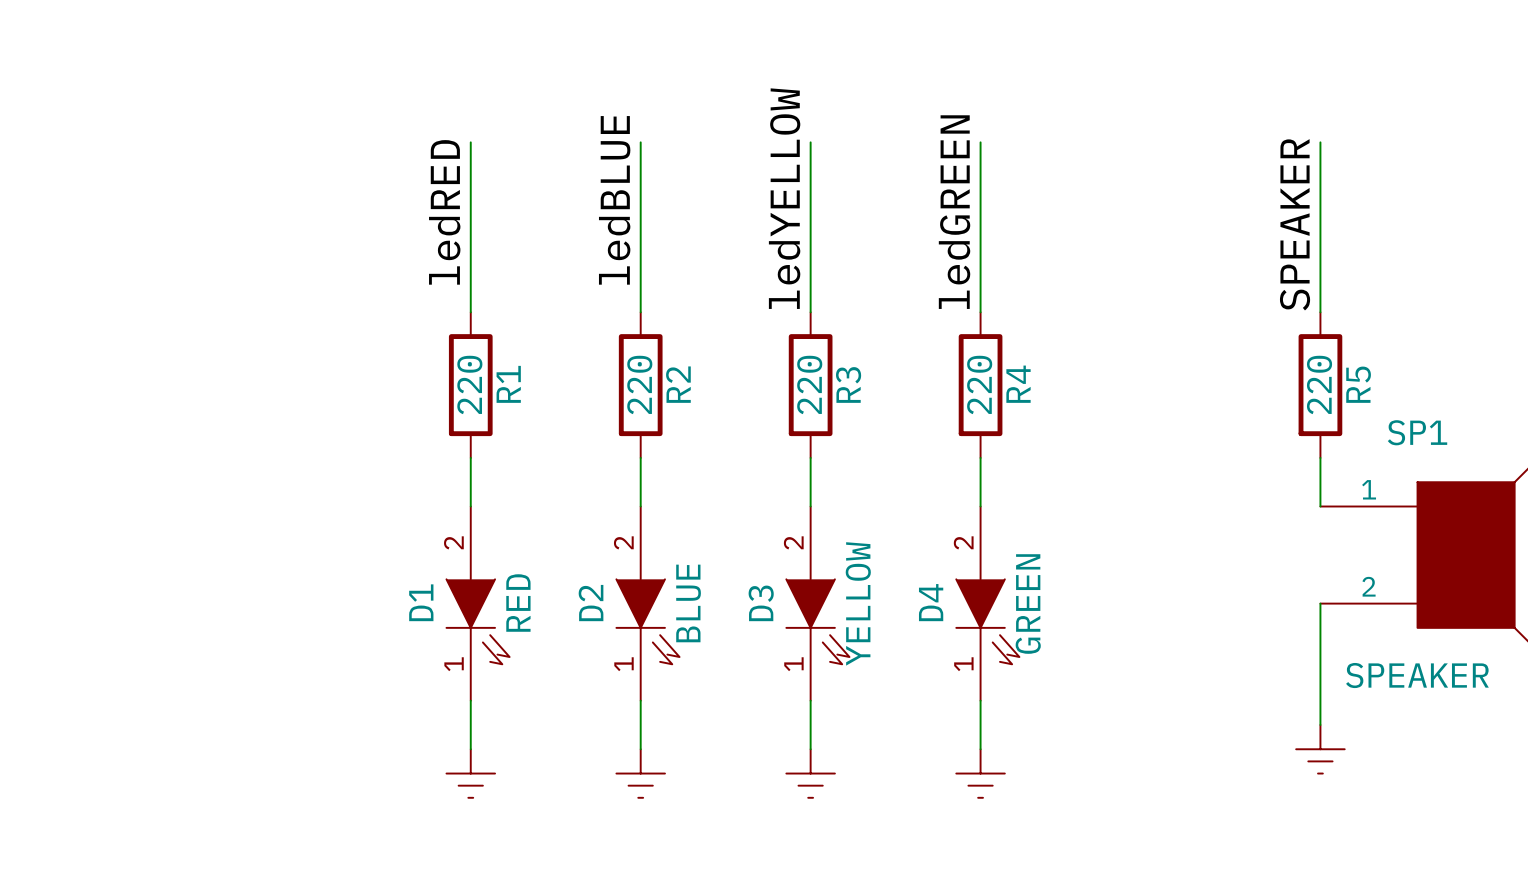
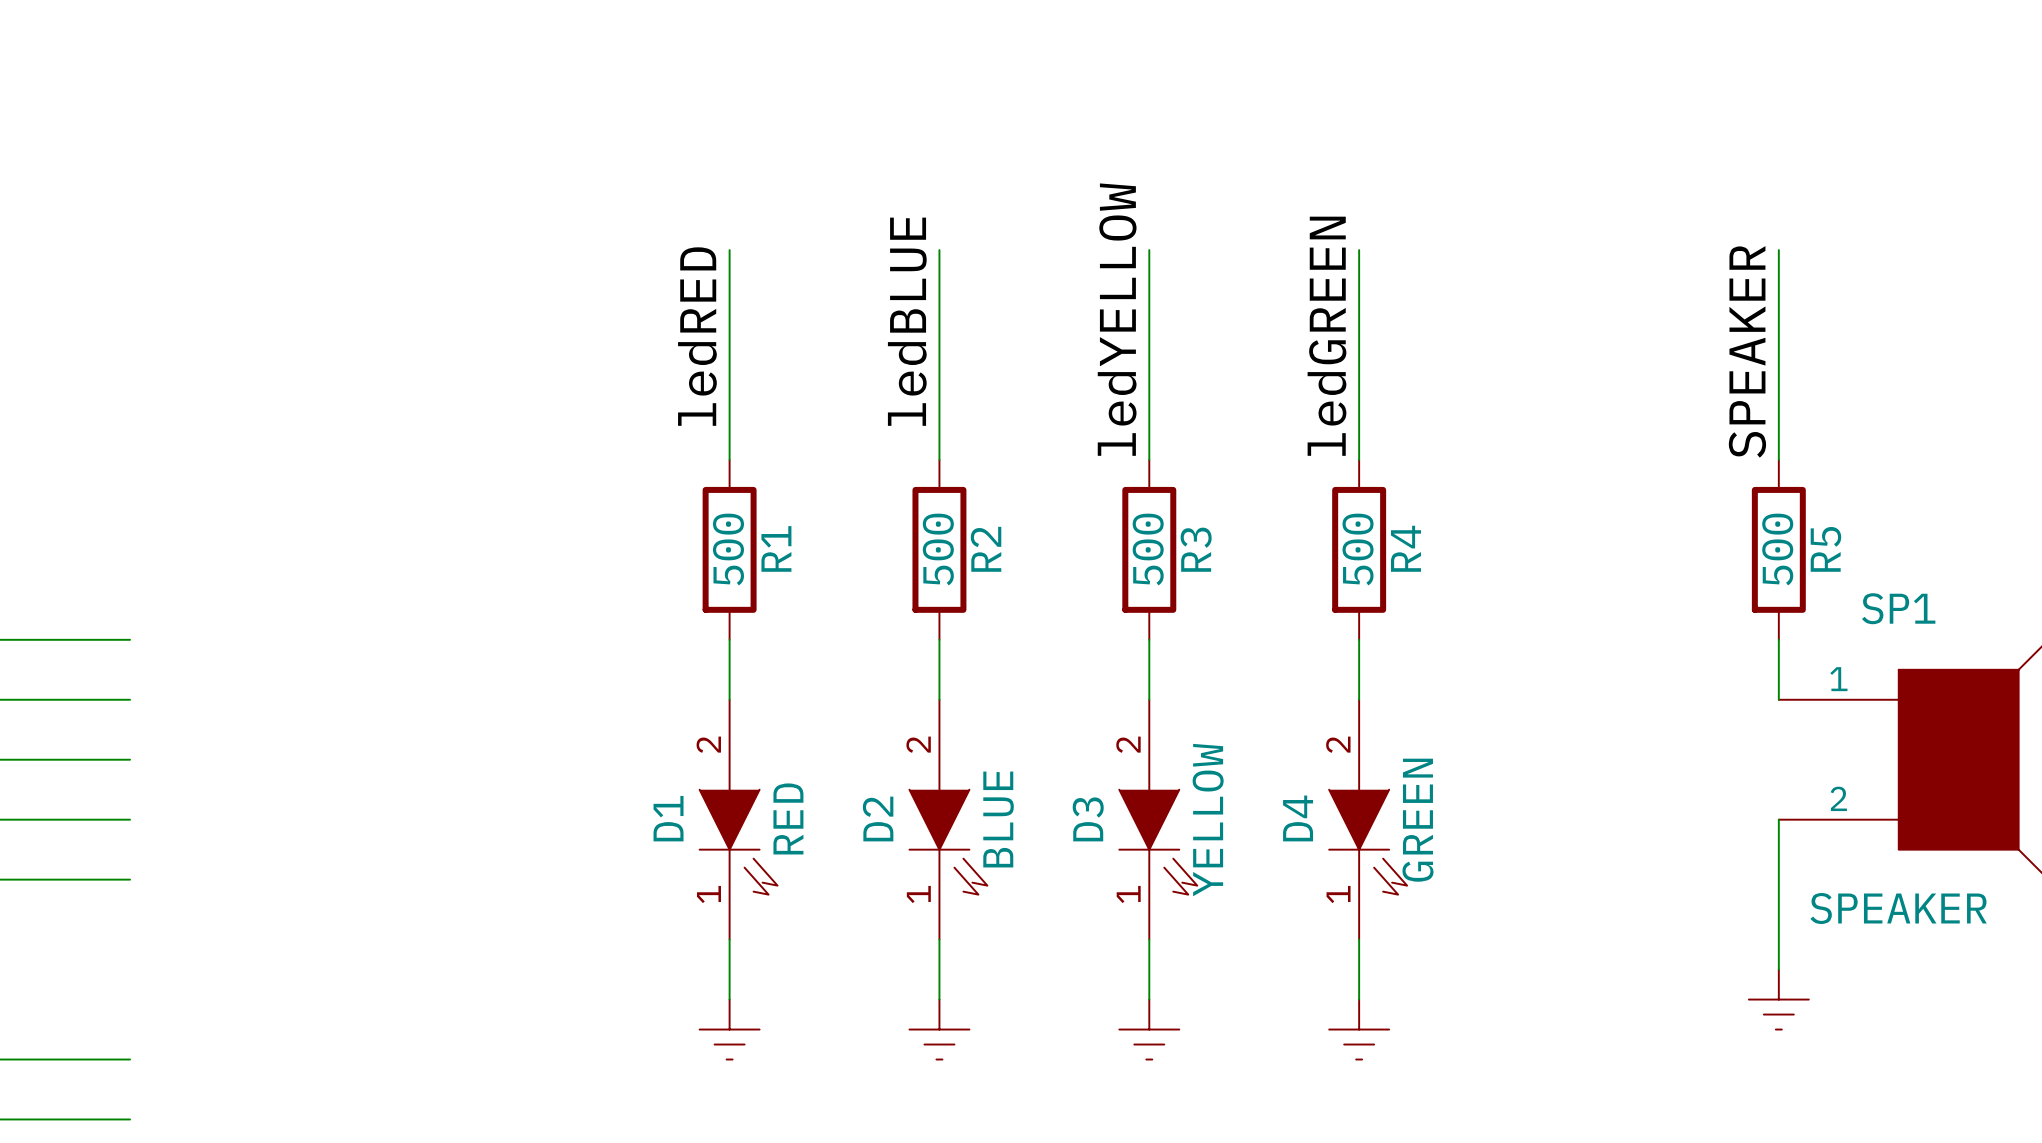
R1 value: 220 (469, 384) -> 500 (728, 549)
R2 value: 220 (639, 384) -> 500 (938, 549)
R3 value: 220 (809, 384) -> 500 (1148, 549)
R4 value: 220 (979, 384) -> 500 (1358, 549)
R5 value: 220 (1319, 384) -> 500 (1777, 549)

